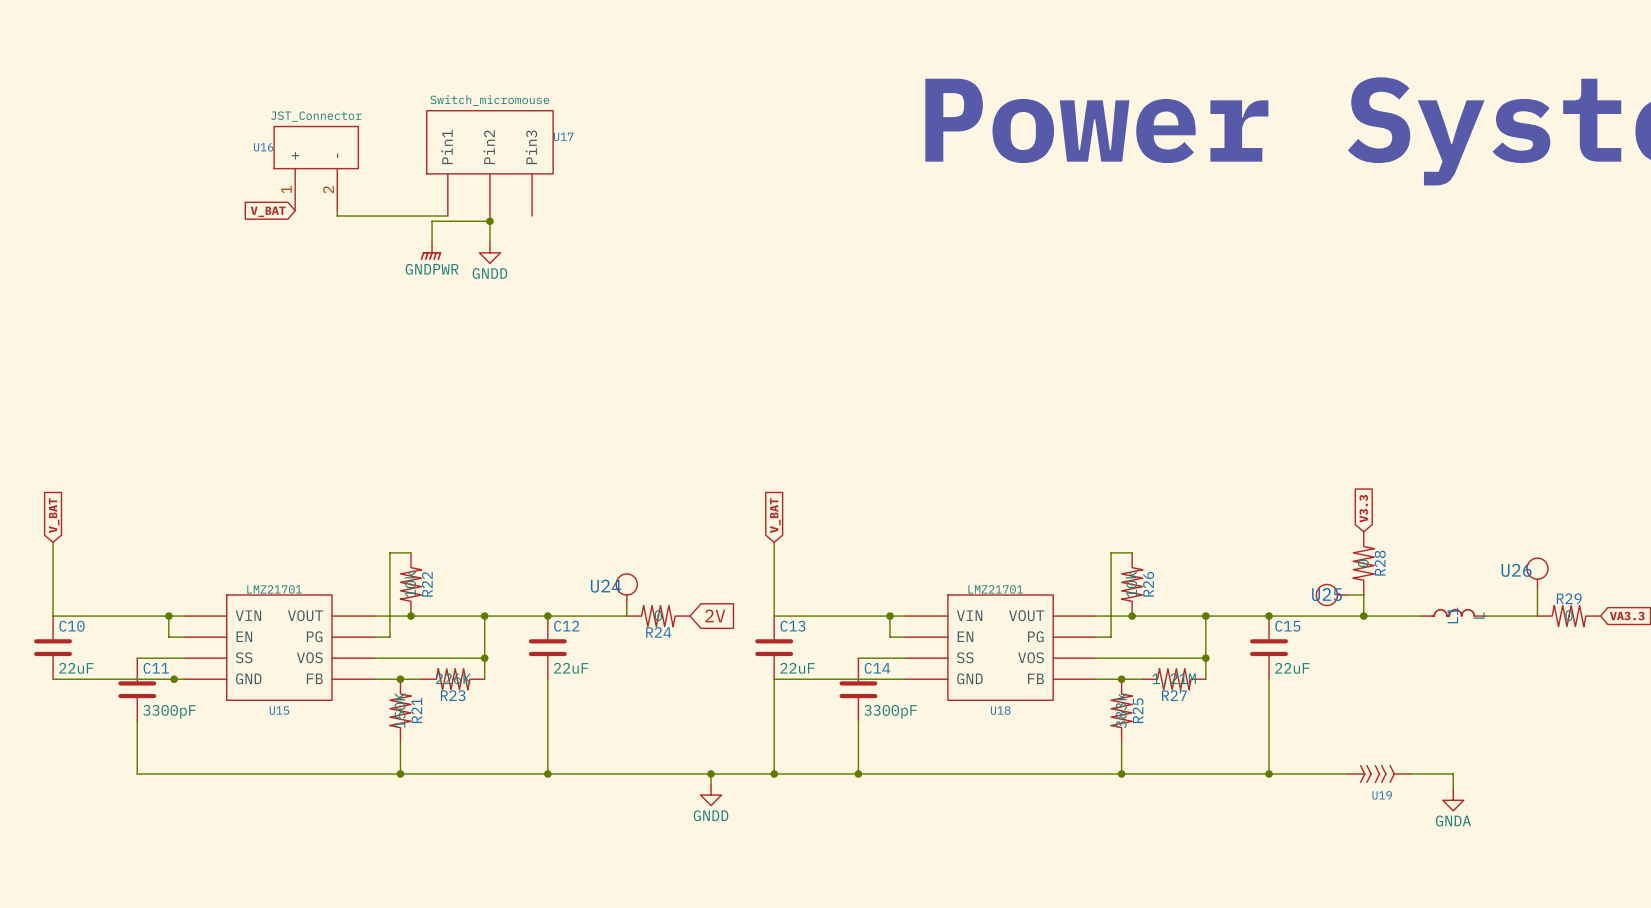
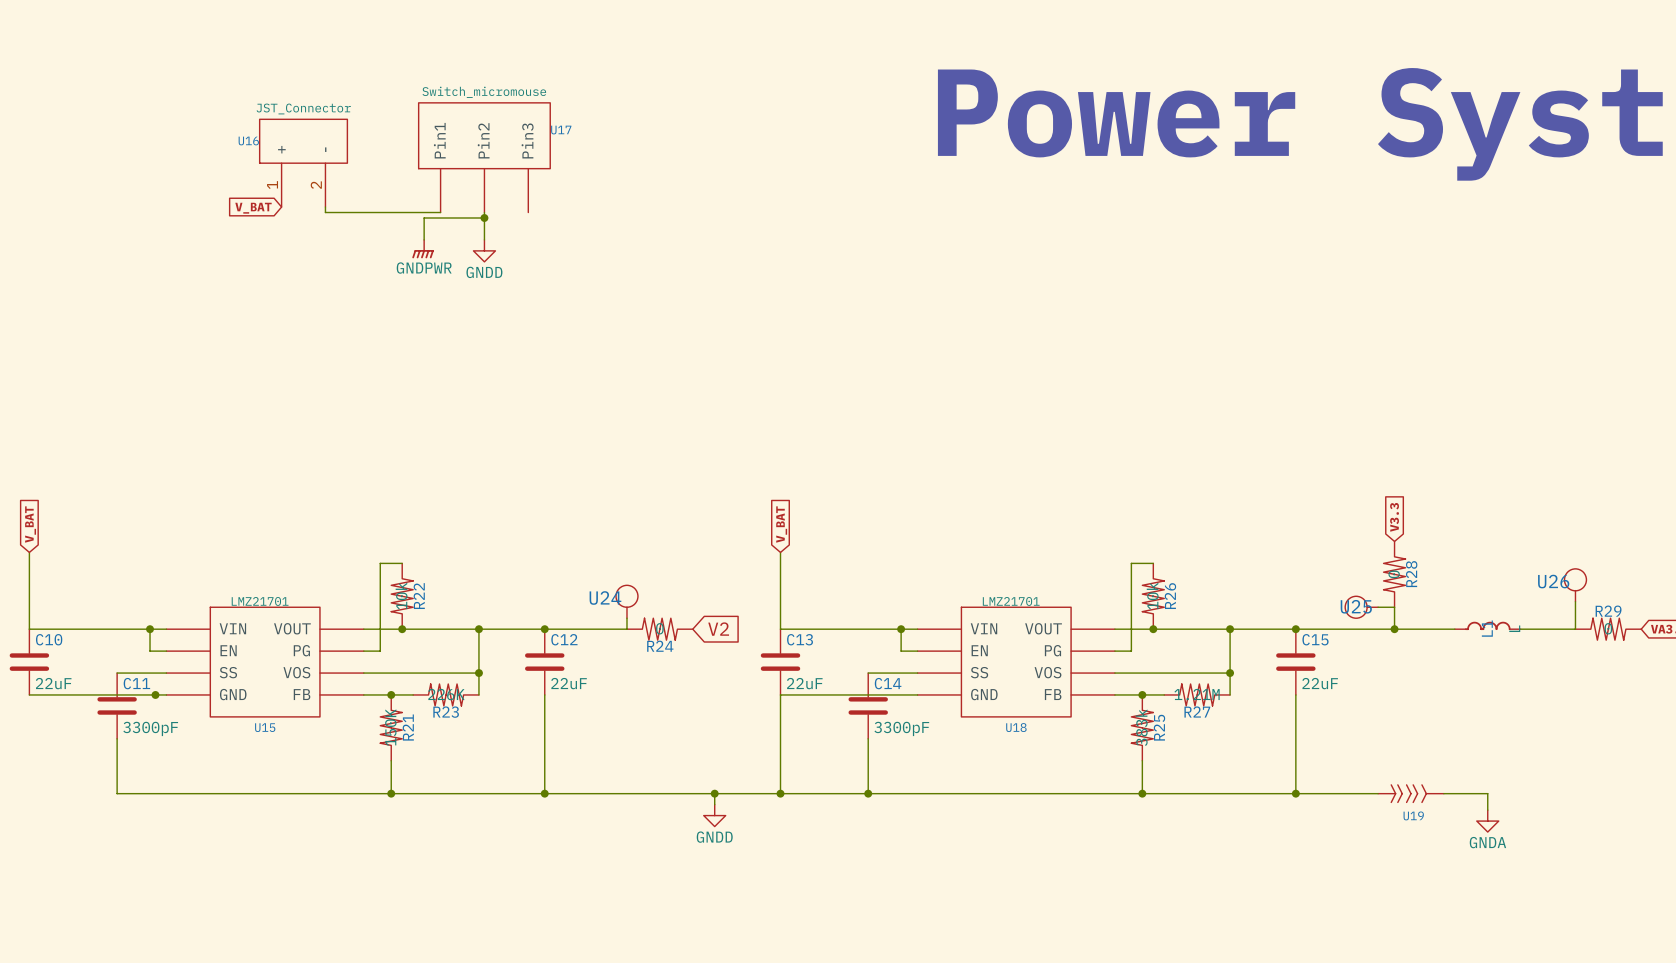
global label: 2V (715, 615) -> V2 (718, 629)

